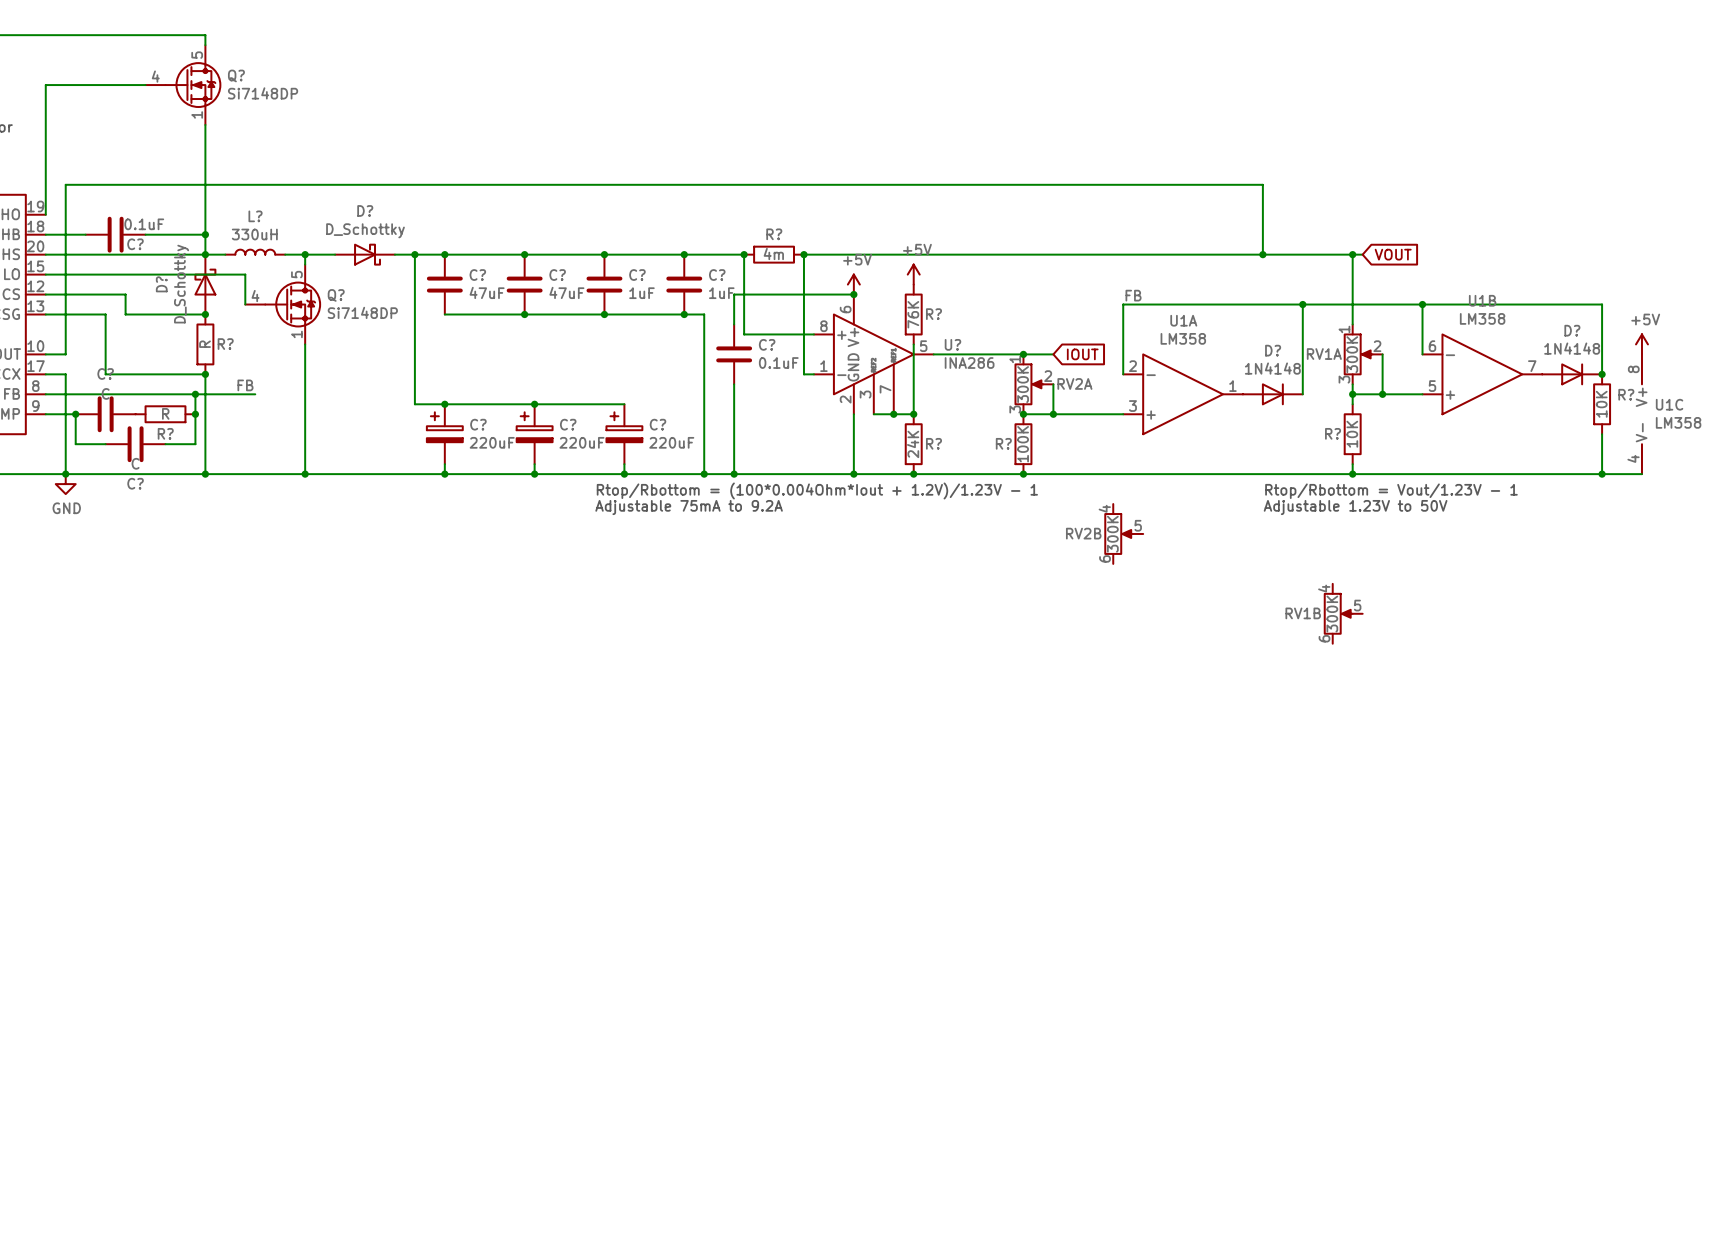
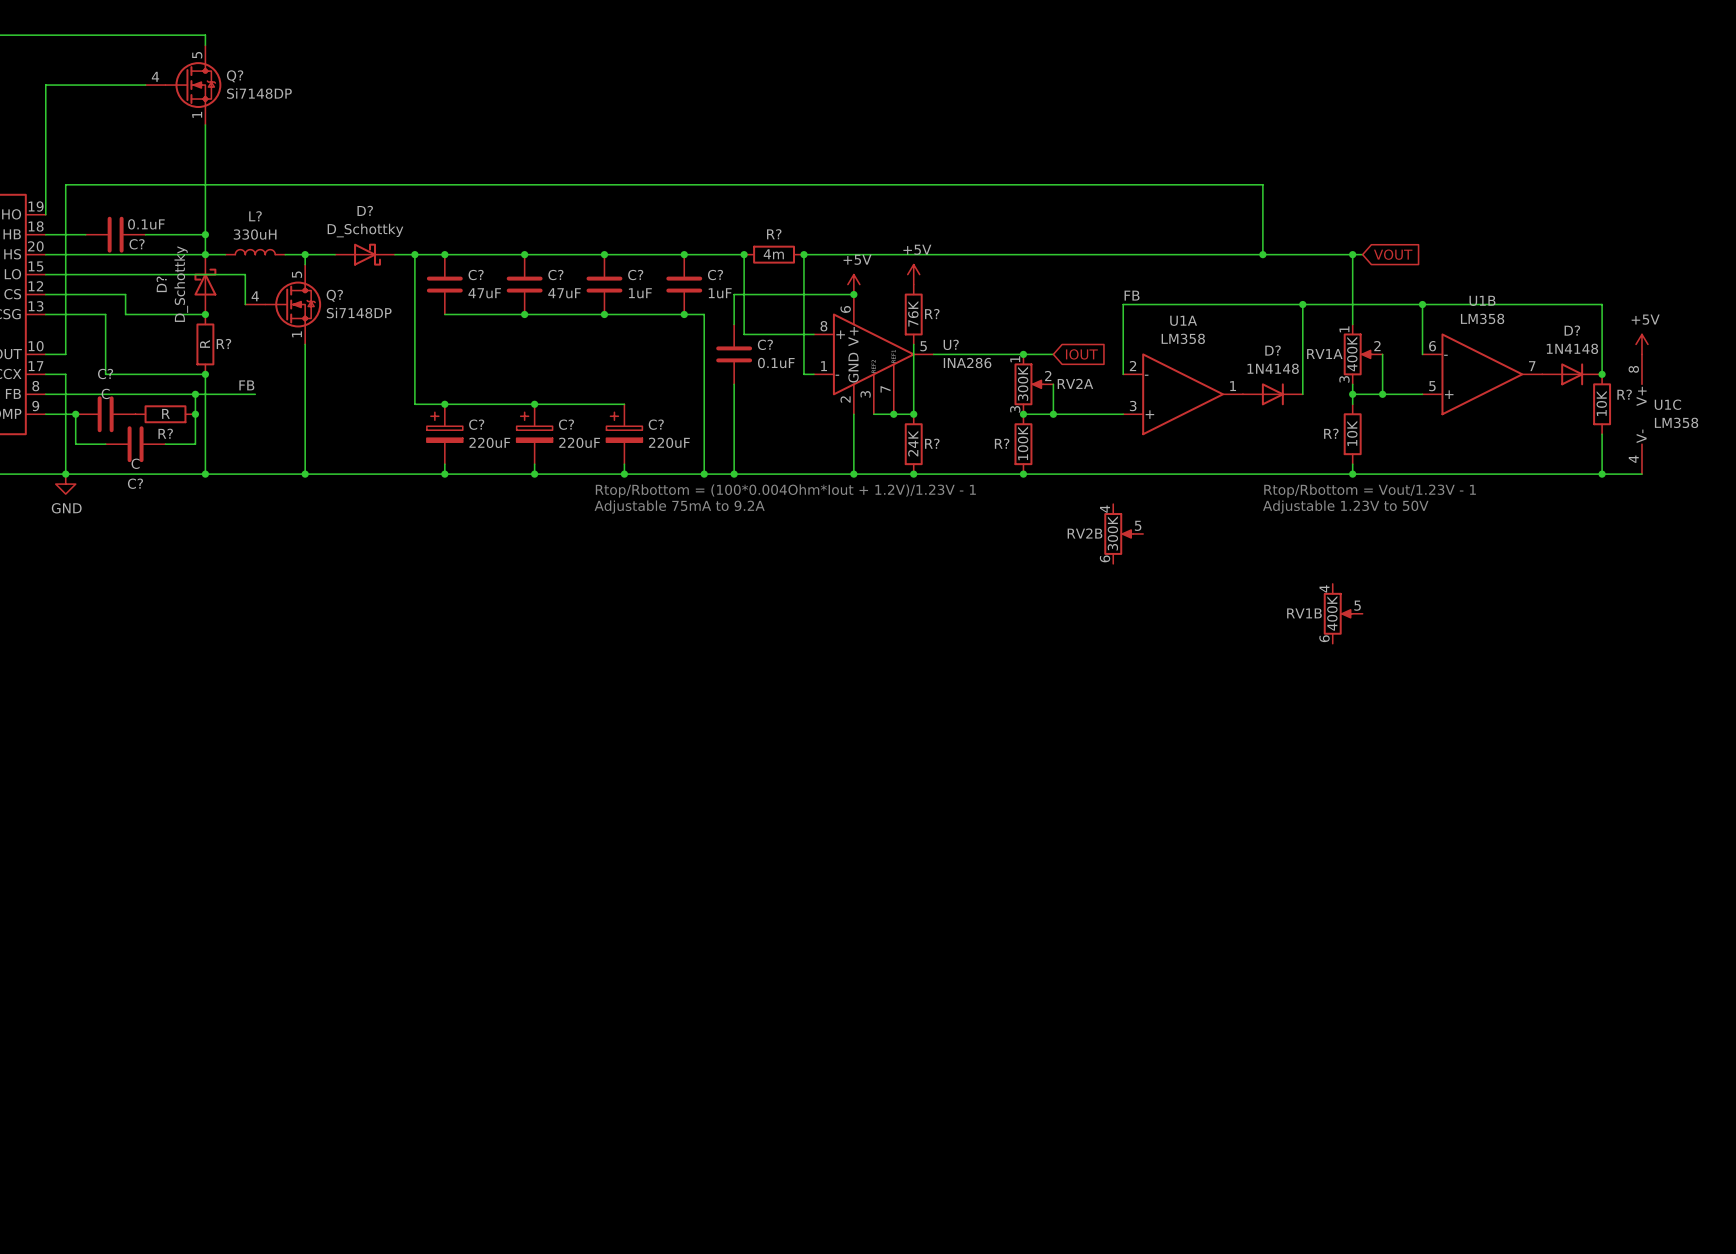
RV1A value: 300K (1352, 354) -> 400K (1352, 353)
RV1B value: 300K (1332, 614) -> 400K (1332, 613)

